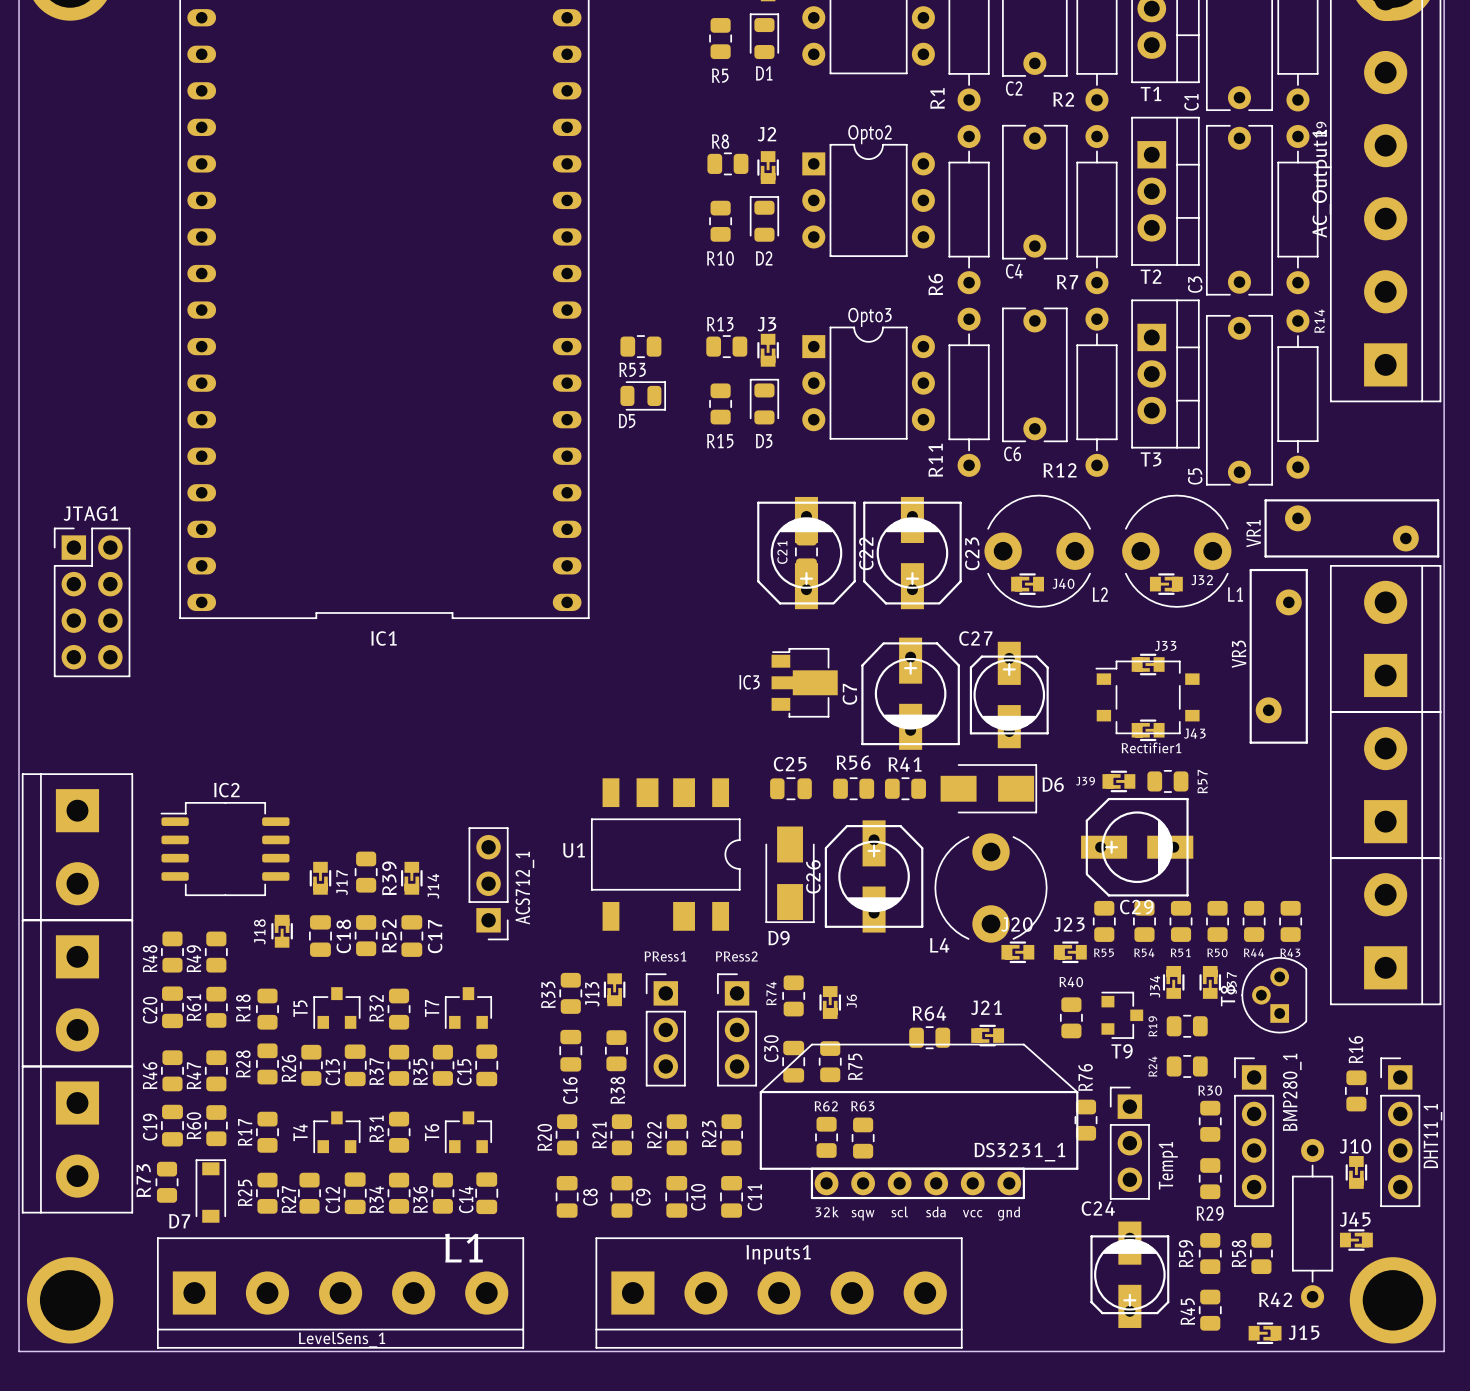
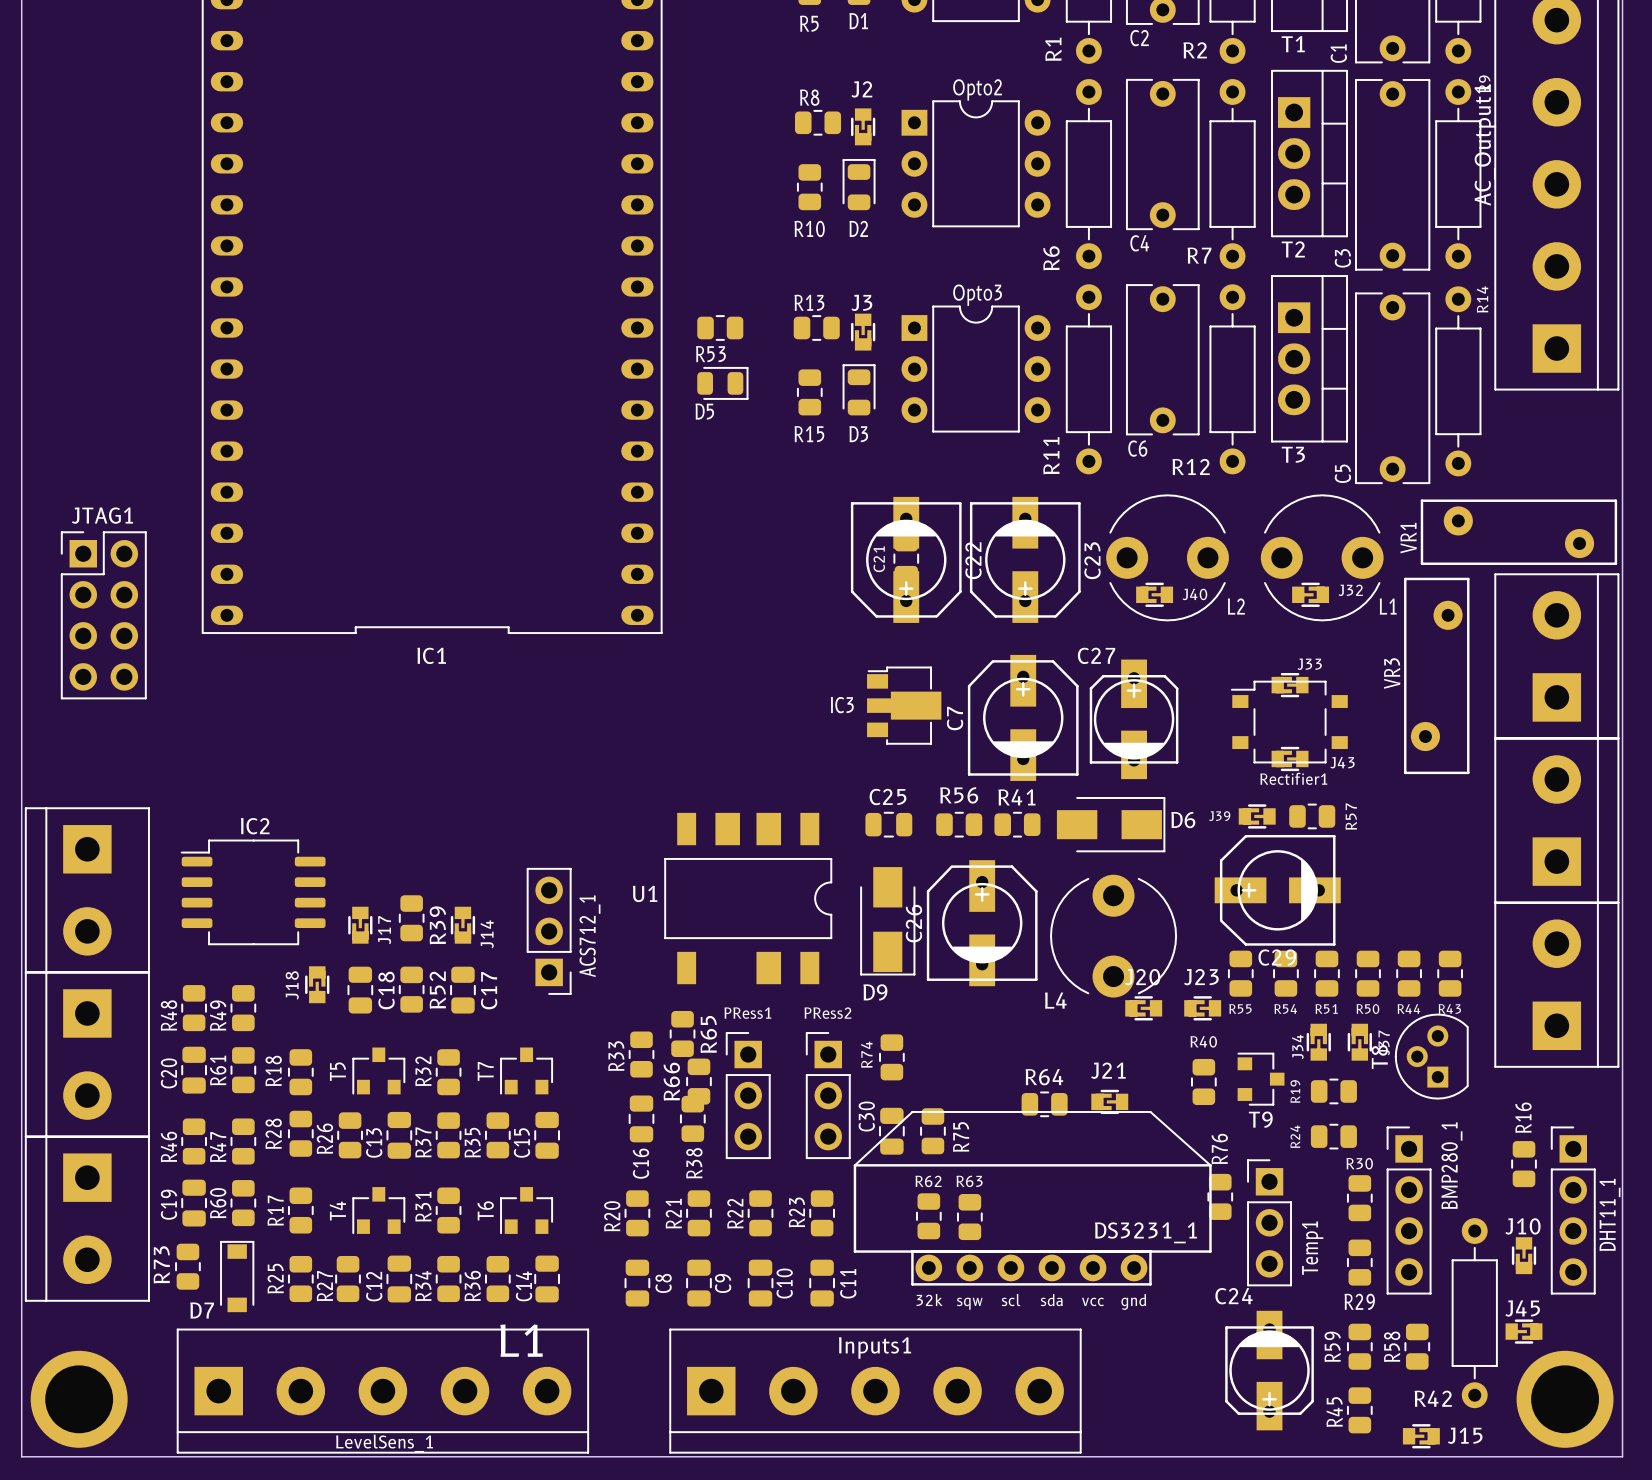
R65: none -> (682, 1033)
J13: (614, 989) -> none
J6: (830, 1002) -> none
R66: none -> (698, 1081)

